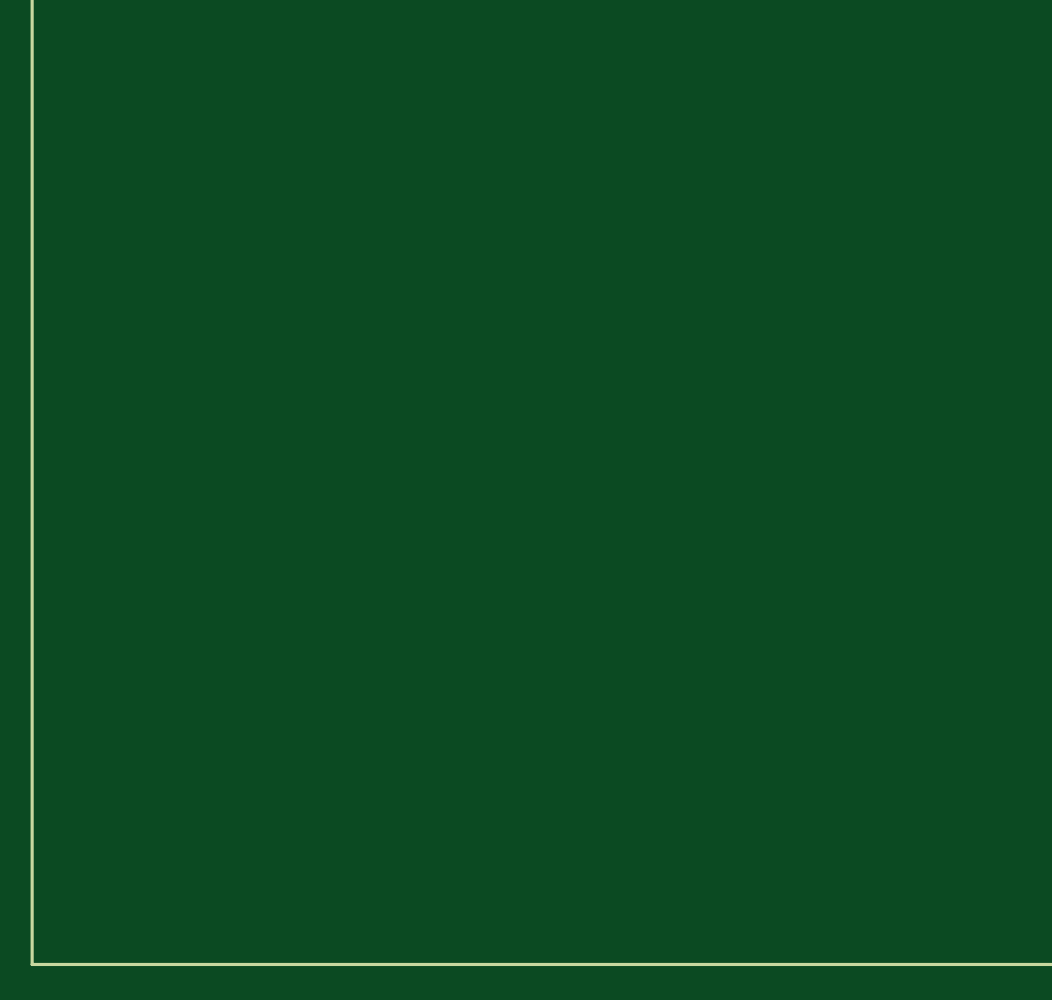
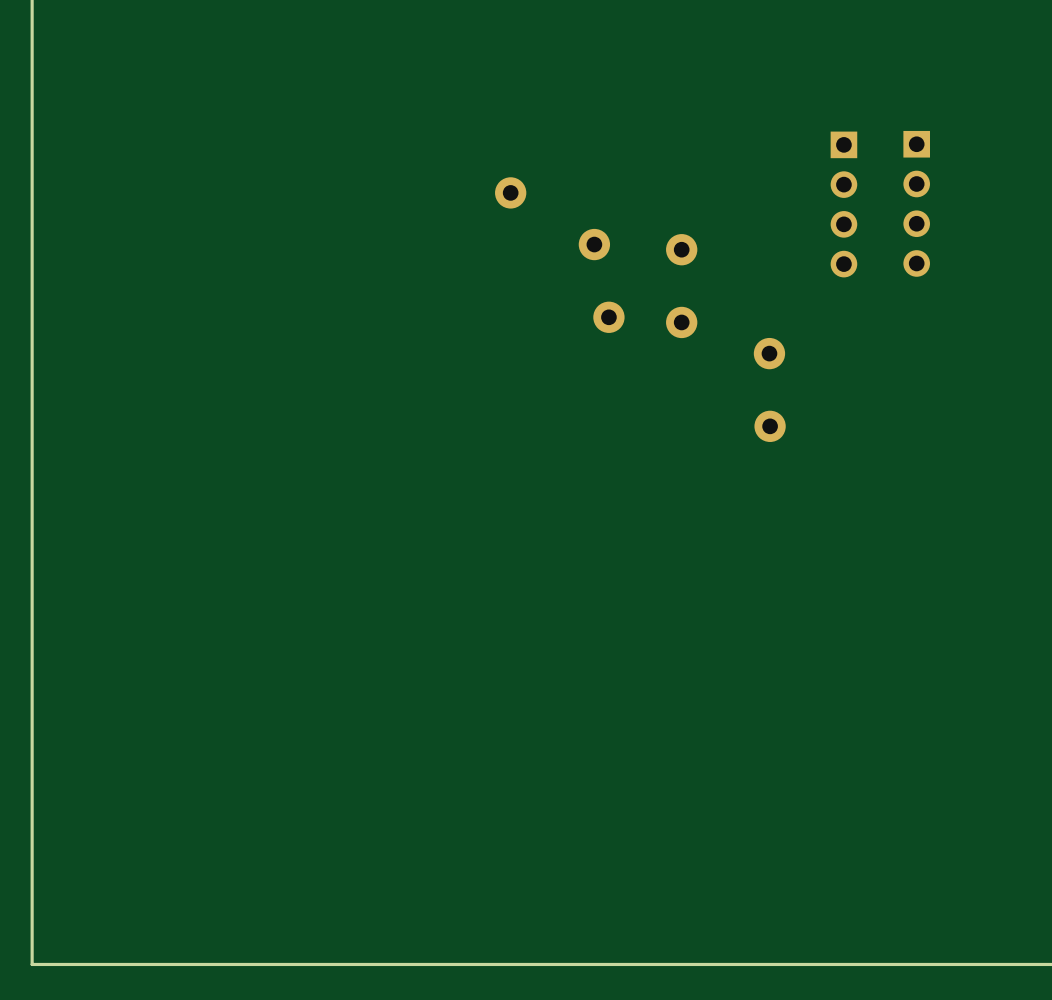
part: none -> (510, 192)
part: none -> (916, 203)
part: none -> (843, 204)
part: none -> (594, 244)
part: none -> (681, 249)
part: none -> (608, 317)
part: none -> (681, 322)
part: none -> (769, 353)
part: none -> (770, 426)

